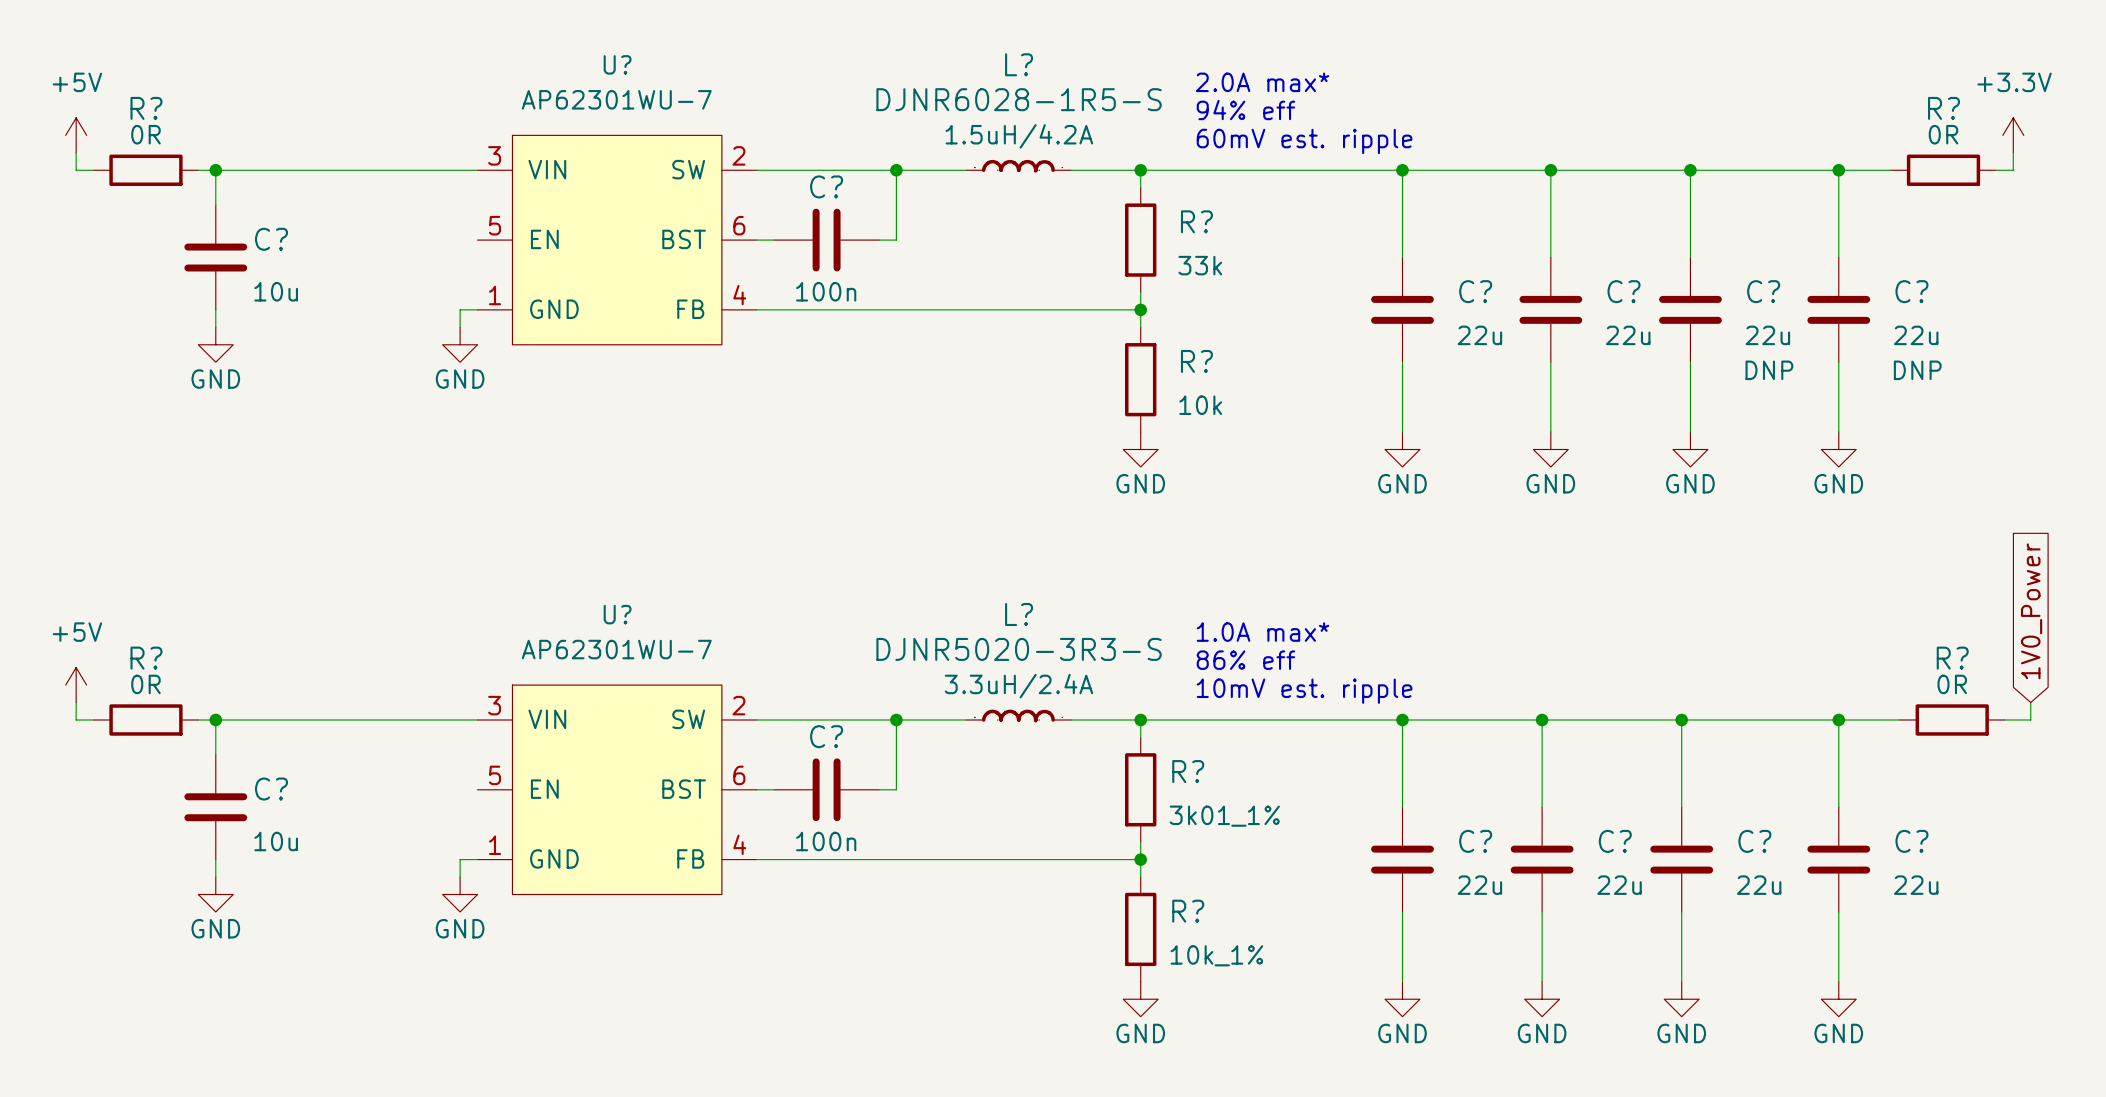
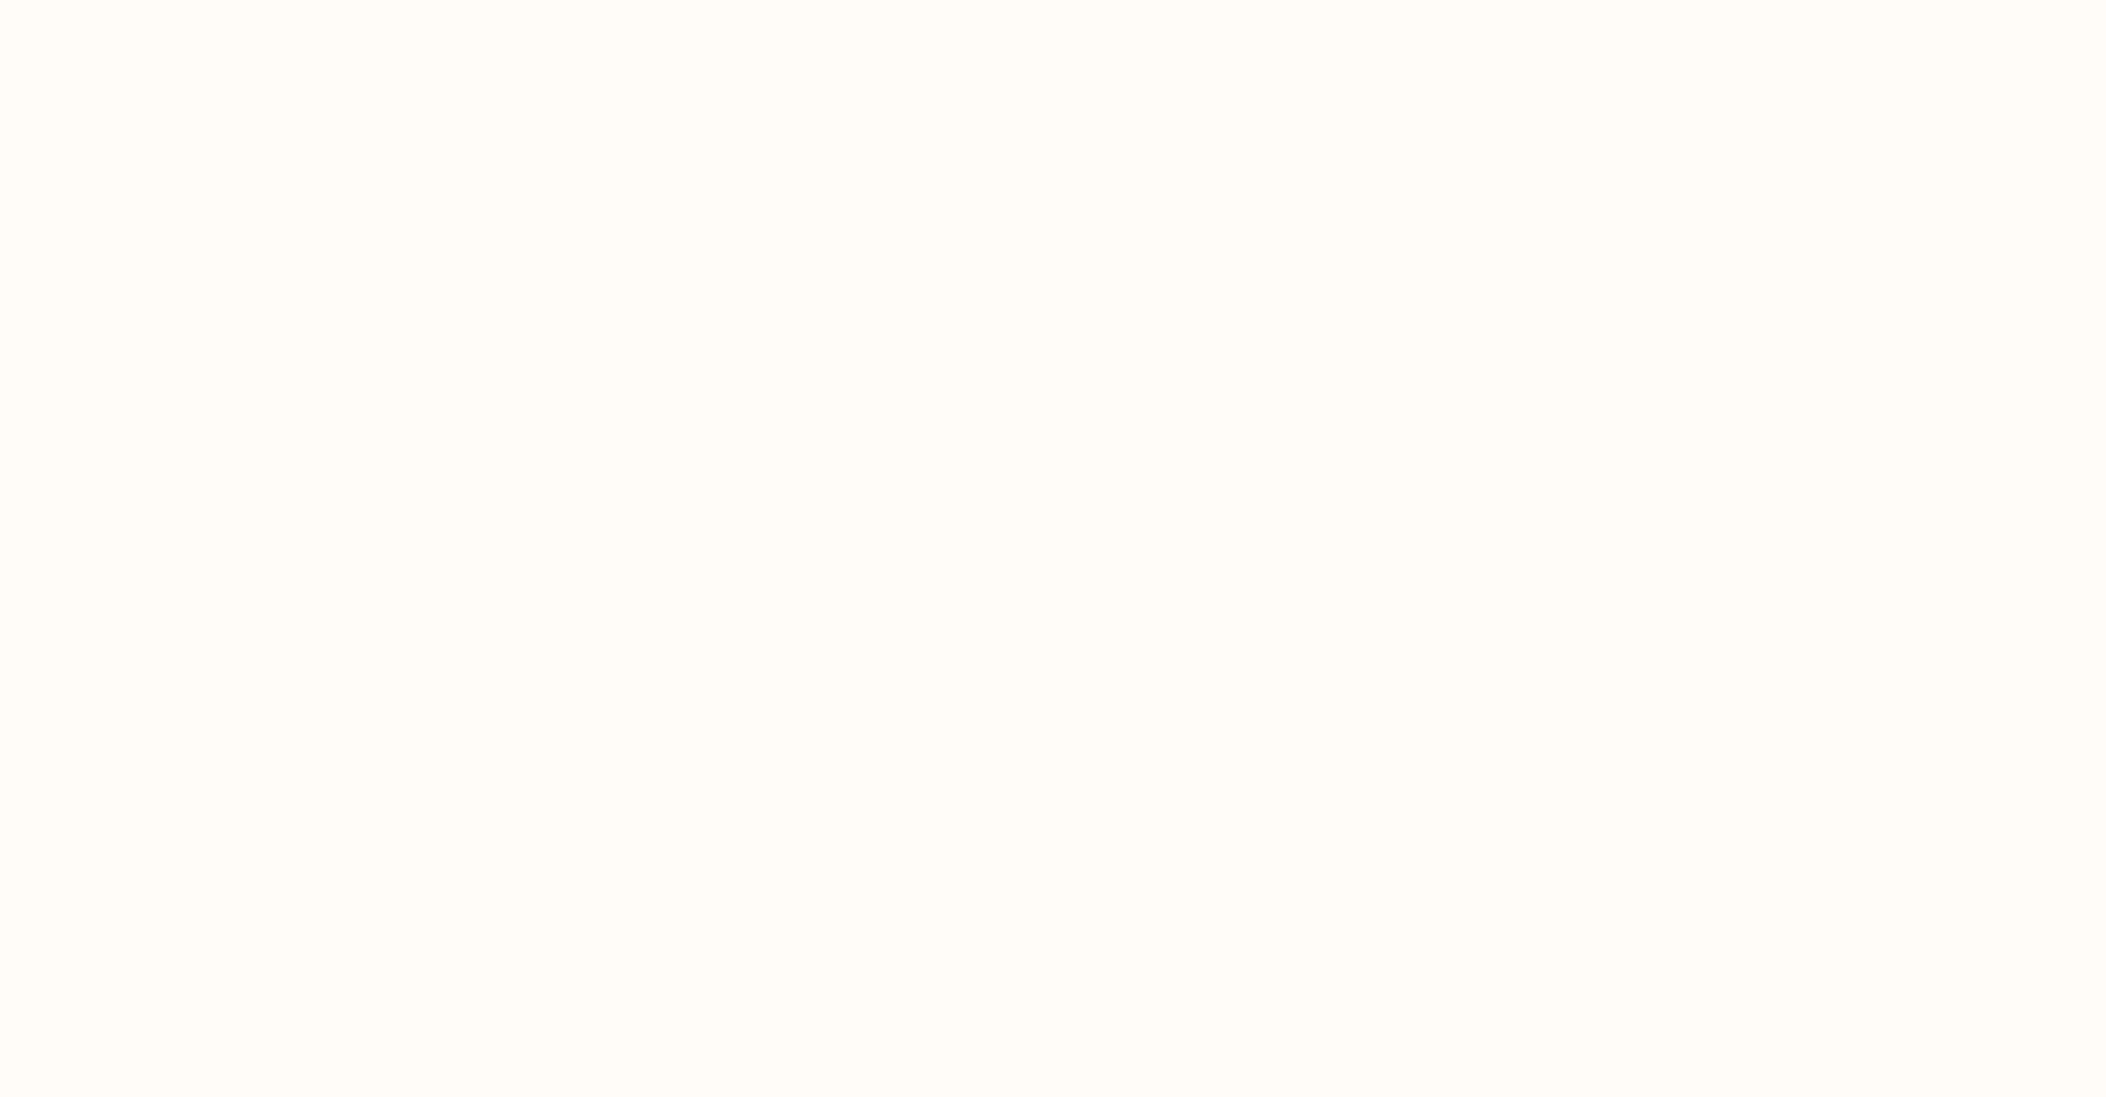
text: 2.0A max* (1262, 82) -> none
text: 94% eff (1245, 110) -> none
power symbol: +5V (76, 135) -> none
power symbol: +3.3V (2013, 135) -> none
text: 60mV est. ripple (1304, 141) -> none
wire: (76, 152) (76, 170) (93, 170) -> none
wire: (2013, 152) (2013, 170) (1995, 170) -> none
L?: DJNR6028-1R5-S (1018, 166) -> none
R?: (145, 170) -> none
wire: (198, 170) (477, 170) -> none
wire: (215, 170) (215, 205) -> none
junction: (215, 170) -> none
wire: (756, 170) (966, 170) -> none
wire: (896, 170) (896, 240) (878, 240) -> none
junction: (896, 170) -> none
wire: (1070, 170) (1891, 170) -> none
wire: (1140, 170) (1140, 187) -> none
junction: (1140, 170) -> none
wire: (1402, 170) (1402, 257) -> none
junction: (1402, 170) -> none
wire: (1550, 170) (1550, 257) -> none
junction: (1550, 170) -> none
wire: (1690, 170) (1690, 257) -> none
junction: (1690, 170) -> none
wire: (1838, 170) (1838, 257) -> none
junction: (1838, 170) -> none
R?: (1943, 170) -> none
U?: AP62301WU-7 (617, 240) -> none
wire: (756, 240) (774, 240) -> none
C?: (826, 240) -> none
R?: (1140, 240) -> none
C?: (215, 257) -> none
wire: (1140, 292) (1140, 327) -> none
wire: (215, 309) (215, 327) -> none
wire: (477, 309) (460, 309) (460, 327) -> none
wire: (756, 309) (1140, 309) -> none
junction: (1140, 309) -> none
C?: (1402, 309) -> none
C?: (1550, 309) -> none
C?: (1690, 309) -> none
C?: (1838, 309) -> none
power symbol: GND (215, 344) -> none
power symbol: GND (460, 344) -> none
wire: (1402, 362) (1402, 432) -> none
wire: (1550, 362) (1550, 432) -> none
wire: (1690, 362) (1690, 432) -> none
wire: (1838, 362) (1838, 432) -> none
R?: (1140, 379) -> none
power symbol: GND (1140, 449) -> none
power symbol: GND (1402, 449) -> none
power symbol: GND (1550, 449) -> none
power symbol: GND (1690, 449) -> none
power symbol: GND (1838, 449) -> none
global label: 1V0_Power (2031, 611) -> none
text: 1.0A max* (1263, 632) -> none
text: 86% eff (1245, 660) -> none
power symbol: +5V (76, 685) -> none
text: 10mV est. ripple (1304, 691) -> none
wire: (76, 702) (76, 719) (93, 719) -> none
wire: (2030, 702) (2030, 719) (2004, 719) -> none
L?: DJNR5020-3R3-S (1018, 716) -> none
R?: (145, 719) -> none
wire: (198, 719) (477, 719) -> none
wire: (215, 719) (215, 754) -> none
junction: (215, 719) -> none
wire: (756, 719) (966, 719) -> none
wire: (896, 719) (896, 789) (878, 789) -> none
junction: (896, 719) -> none
wire: (1070, 719) (1899, 719) -> none
wire: (1140, 719) (1140, 737) -> none
junction: (1140, 719) -> none
wire: (1402, 719) (1402, 807) -> none
junction: (1402, 719) -> none
wire: (1542, 719) (1542, 807) -> none
junction: (1542, 719) -> none
wire: (1681, 719) (1681, 807) -> none
junction: (1681, 719) -> none
wire: (1838, 719) (1838, 807) -> none
junction: (1838, 719) -> none
R?: (1952, 719) -> none
U?: AP62301WU-7 (617, 789) -> none
wire: (756, 789) (774, 789) -> none
C?: (826, 789) -> none
R?: (1140, 789) -> none
C?: (215, 807) -> none
wire: (1140, 842) (1140, 877) -> none
wire: (215, 859) (215, 877) -> none
wire: (477, 859) (460, 859) (460, 877) -> none
wire: (756, 859) (1140, 859) -> none
junction: (1140, 859) -> none
C?: (1402, 859) -> none
C?: (1542, 859) -> none
C?: (1681, 859) -> none
C?: (1838, 859) -> none
power symbol: GND (215, 894) -> none
power symbol: GND (460, 894) -> none
wire: (1402, 911) (1402, 981) -> none
wire: (1542, 911) (1542, 981) -> none
wire: (1681, 911) (1681, 981) -> none
wire: (1838, 911) (1838, 981) -> none
R?: (1140, 929) -> none
power symbol: GND (1140, 999) -> none
power symbol: GND (1402, 999) -> none
power symbol: GND (1542, 999) -> none
power symbol: GND (1681, 999) -> none
power symbol: GND (1838, 999) -> none

